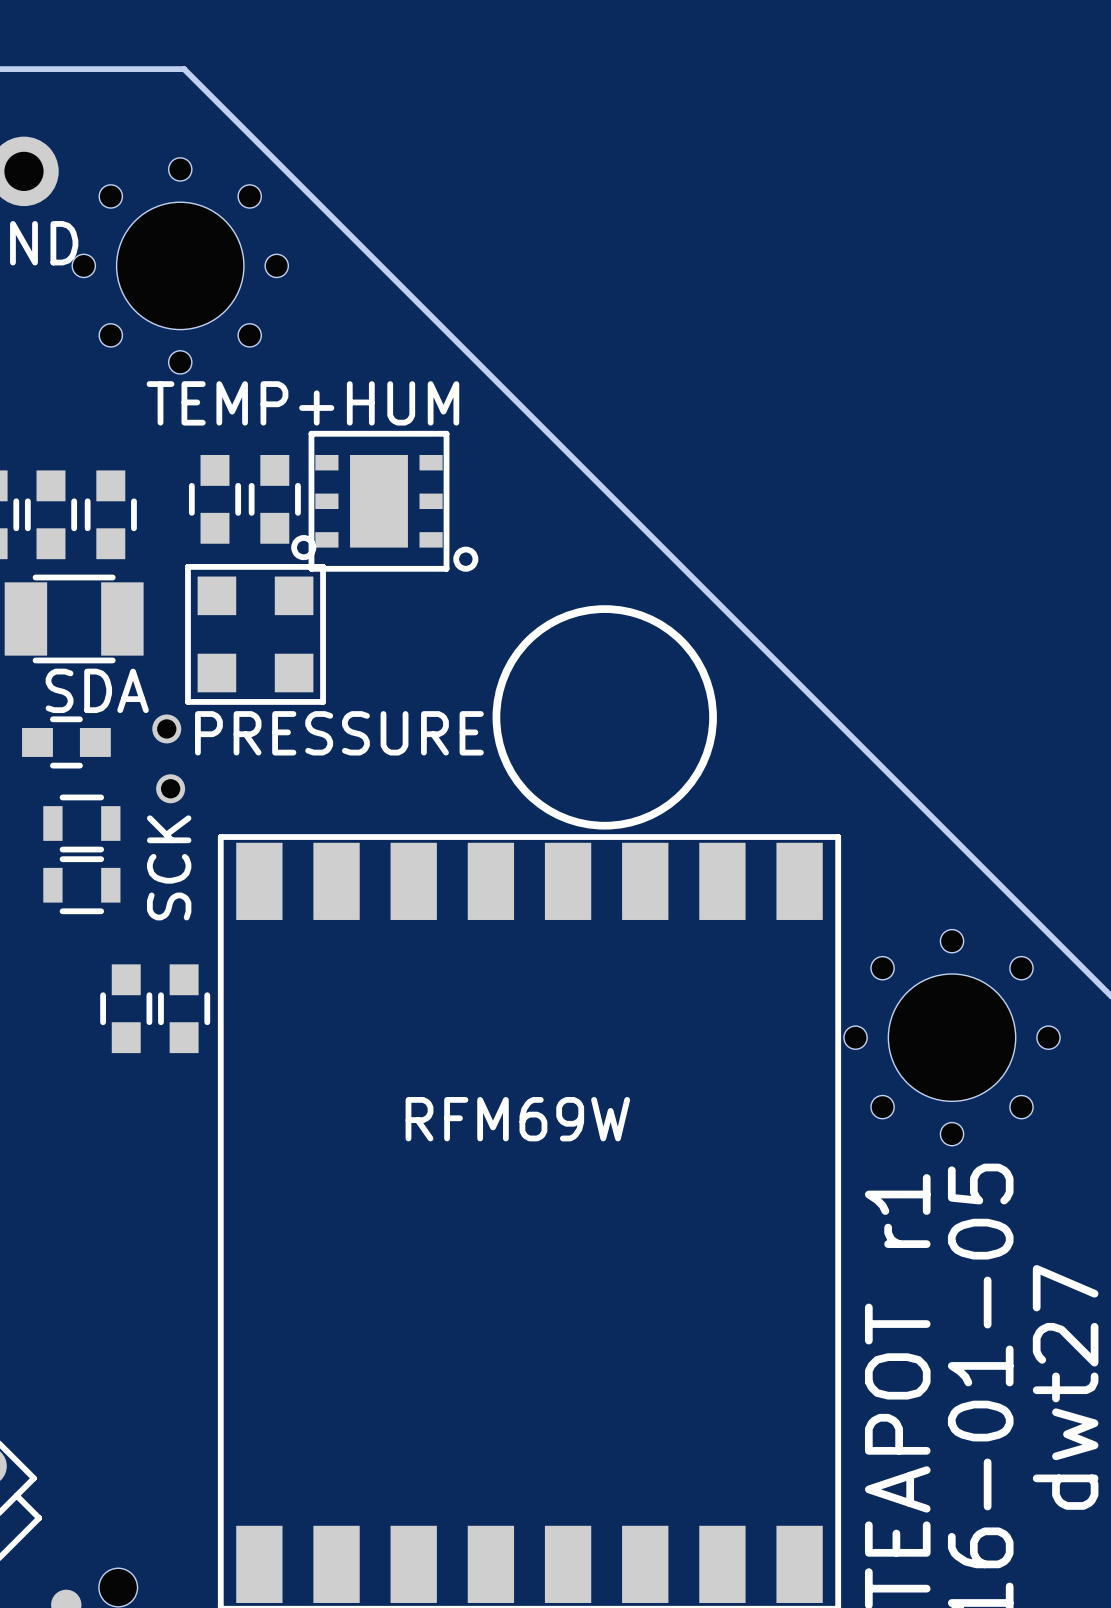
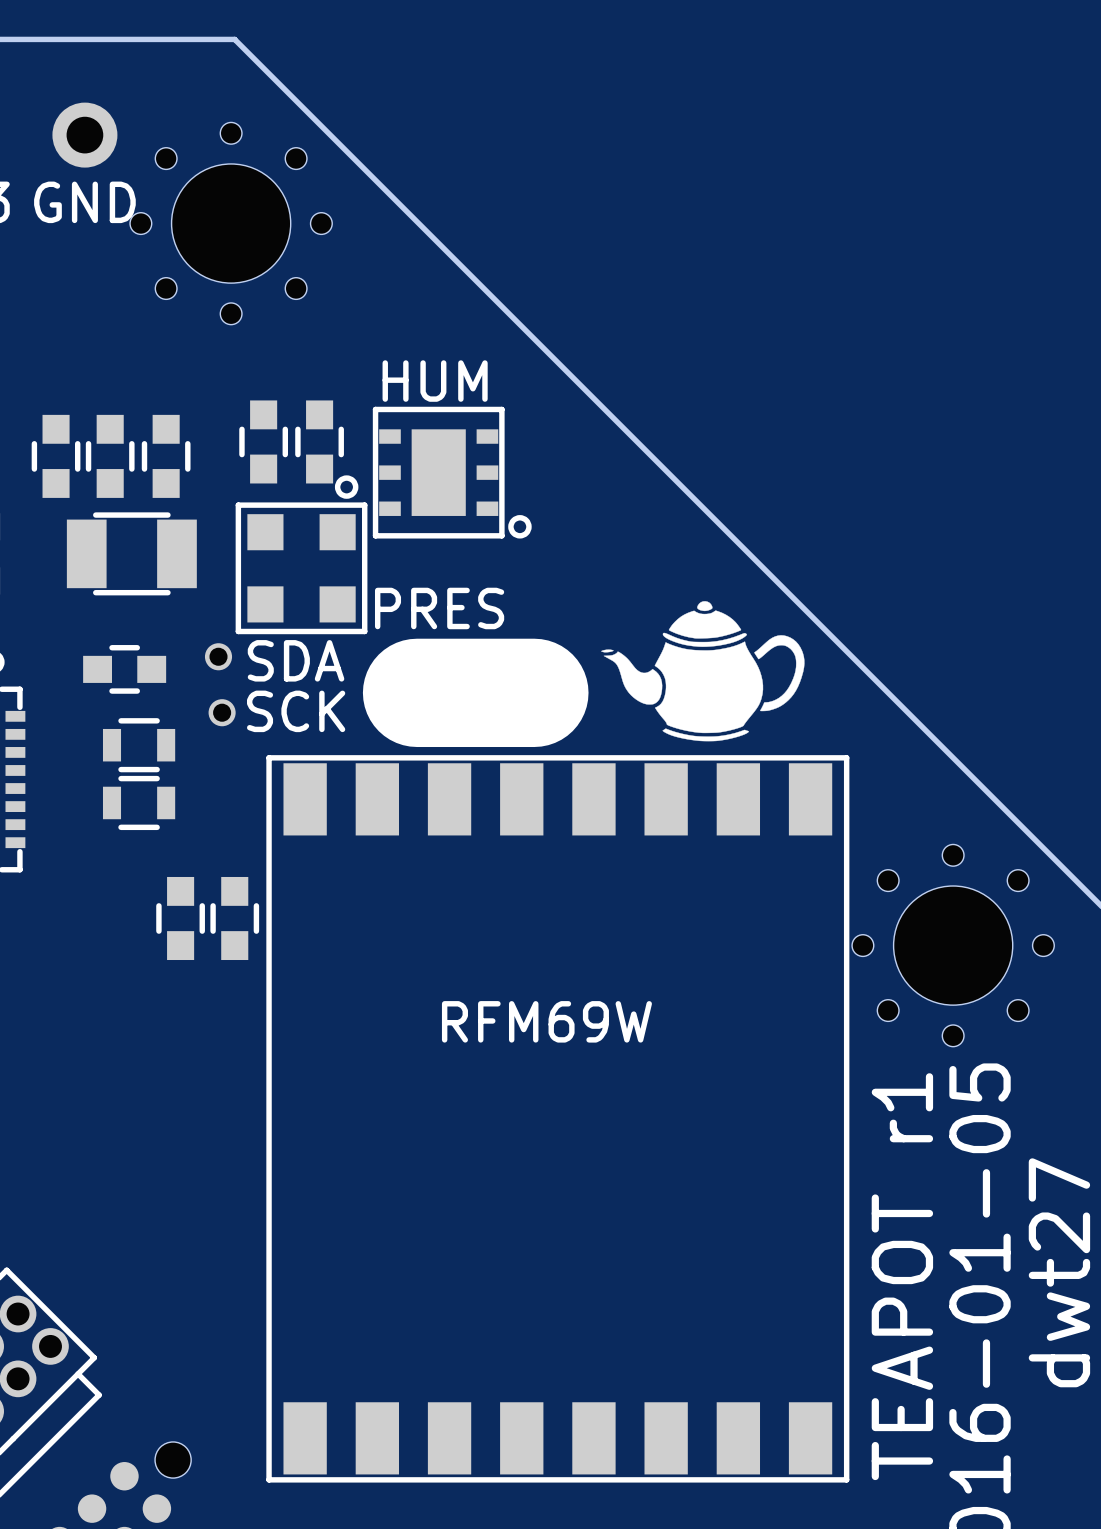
text: TEMP+HUM (302, 403) -> none
text: none -> HUM (435, 381)
part position: (393, 501) -> (452, 472)
drawing: [492, 605, 717, 830] -> none
drawing: none -> [601, 601, 805, 742]
part value position: SDA (97, 690) -> SDA (296, 660)
text: PRESSURE (339, 733) -> PRES (439, 608)
line: none -> (417, 692) (534, 692)
part value rotation: 0° (169, 867) -> 90° clockwise (296, 711)

